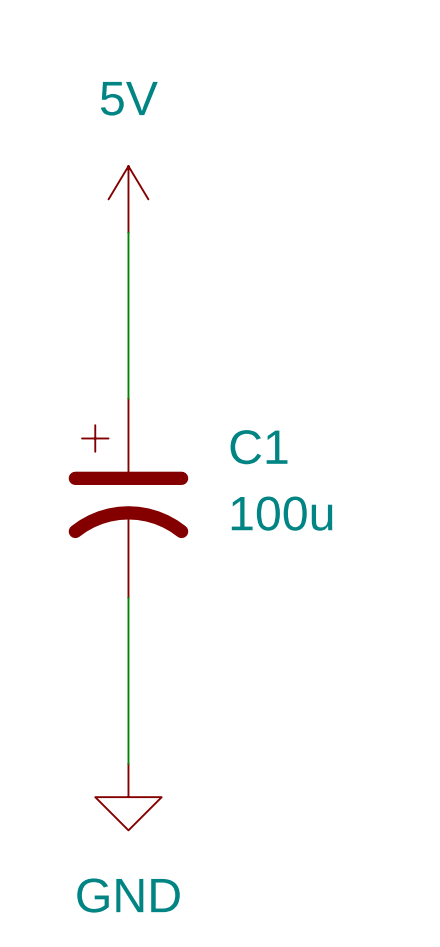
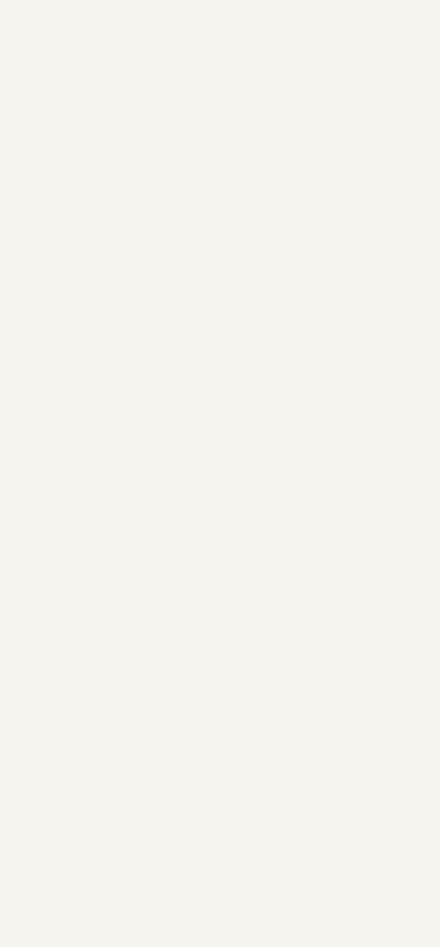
power symbol: 5V (128, 199) -> none
wire: (128, 232) (128, 398) -> none
C1: 100u (128, 498) -> none
wire: (128, 597) (128, 763) -> none
power symbol: GND (128, 797) -> none

